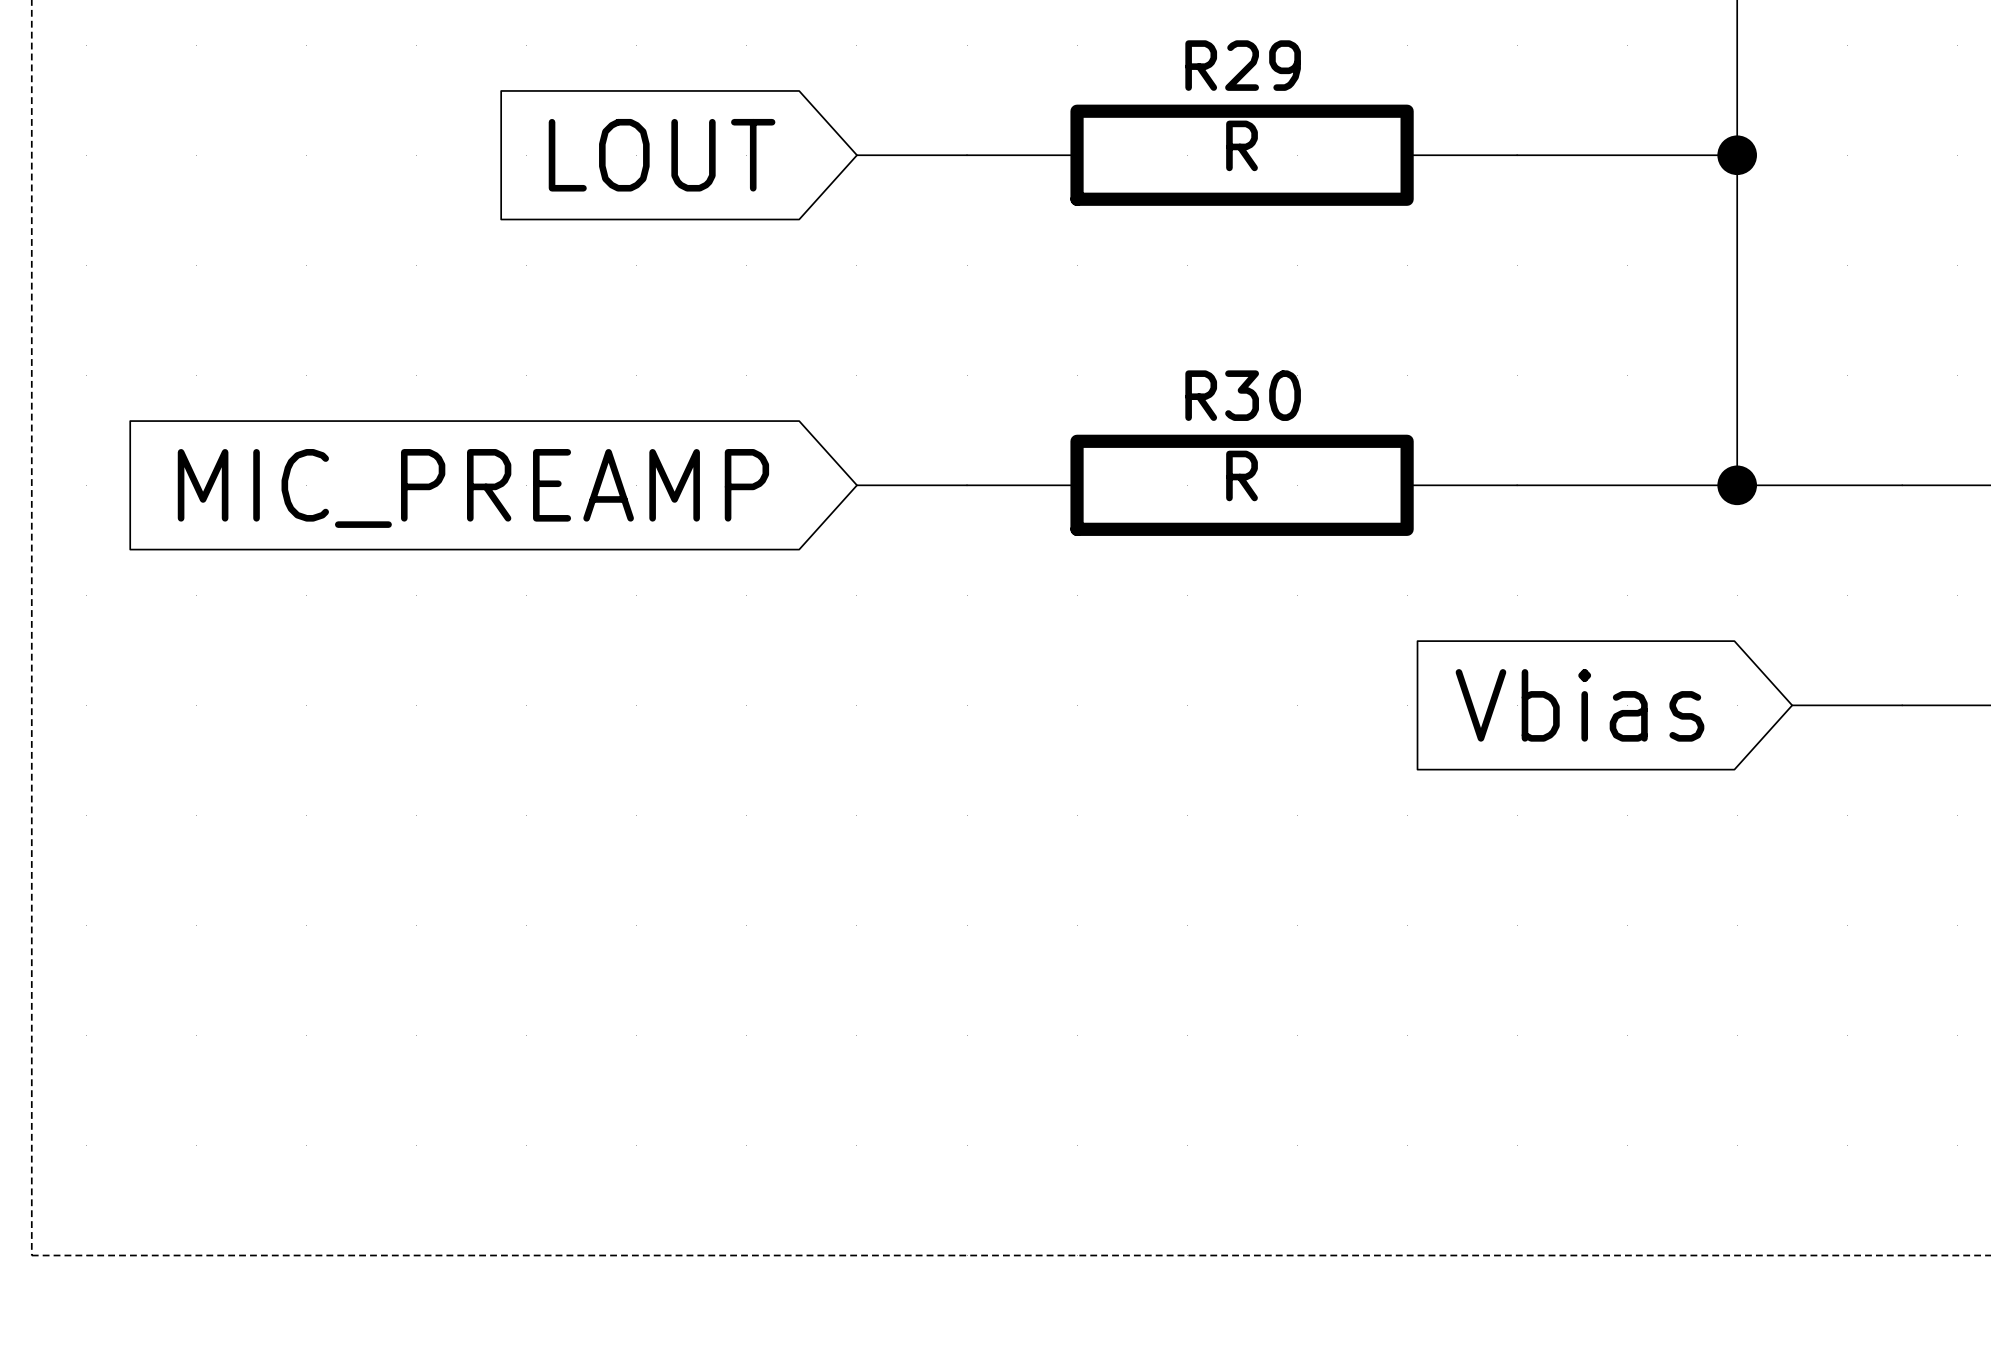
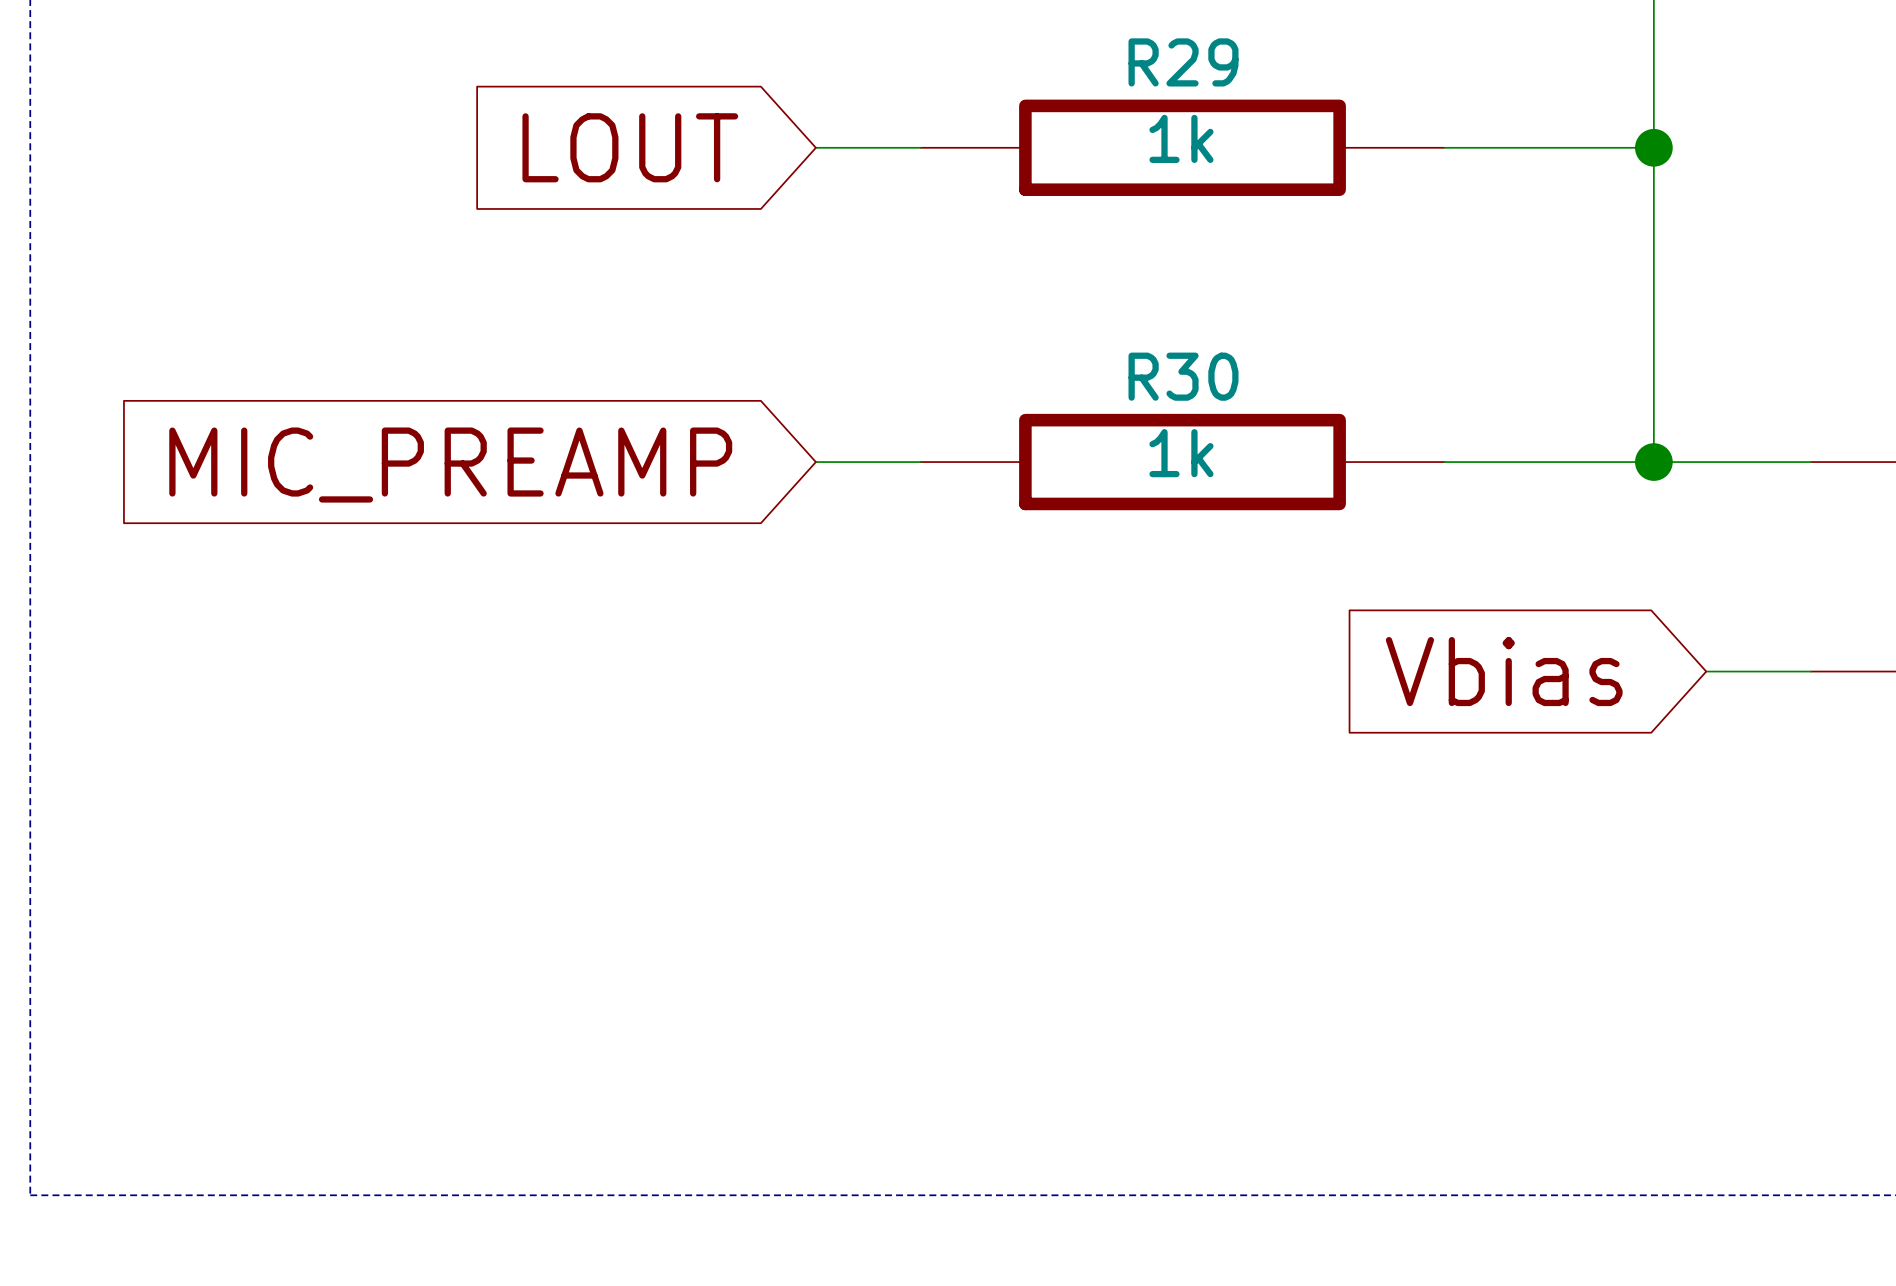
R29 value: R (1242, 145) -> 1k (1181, 138)
R30 value: R (1242, 475) -> 1k (1181, 453)

